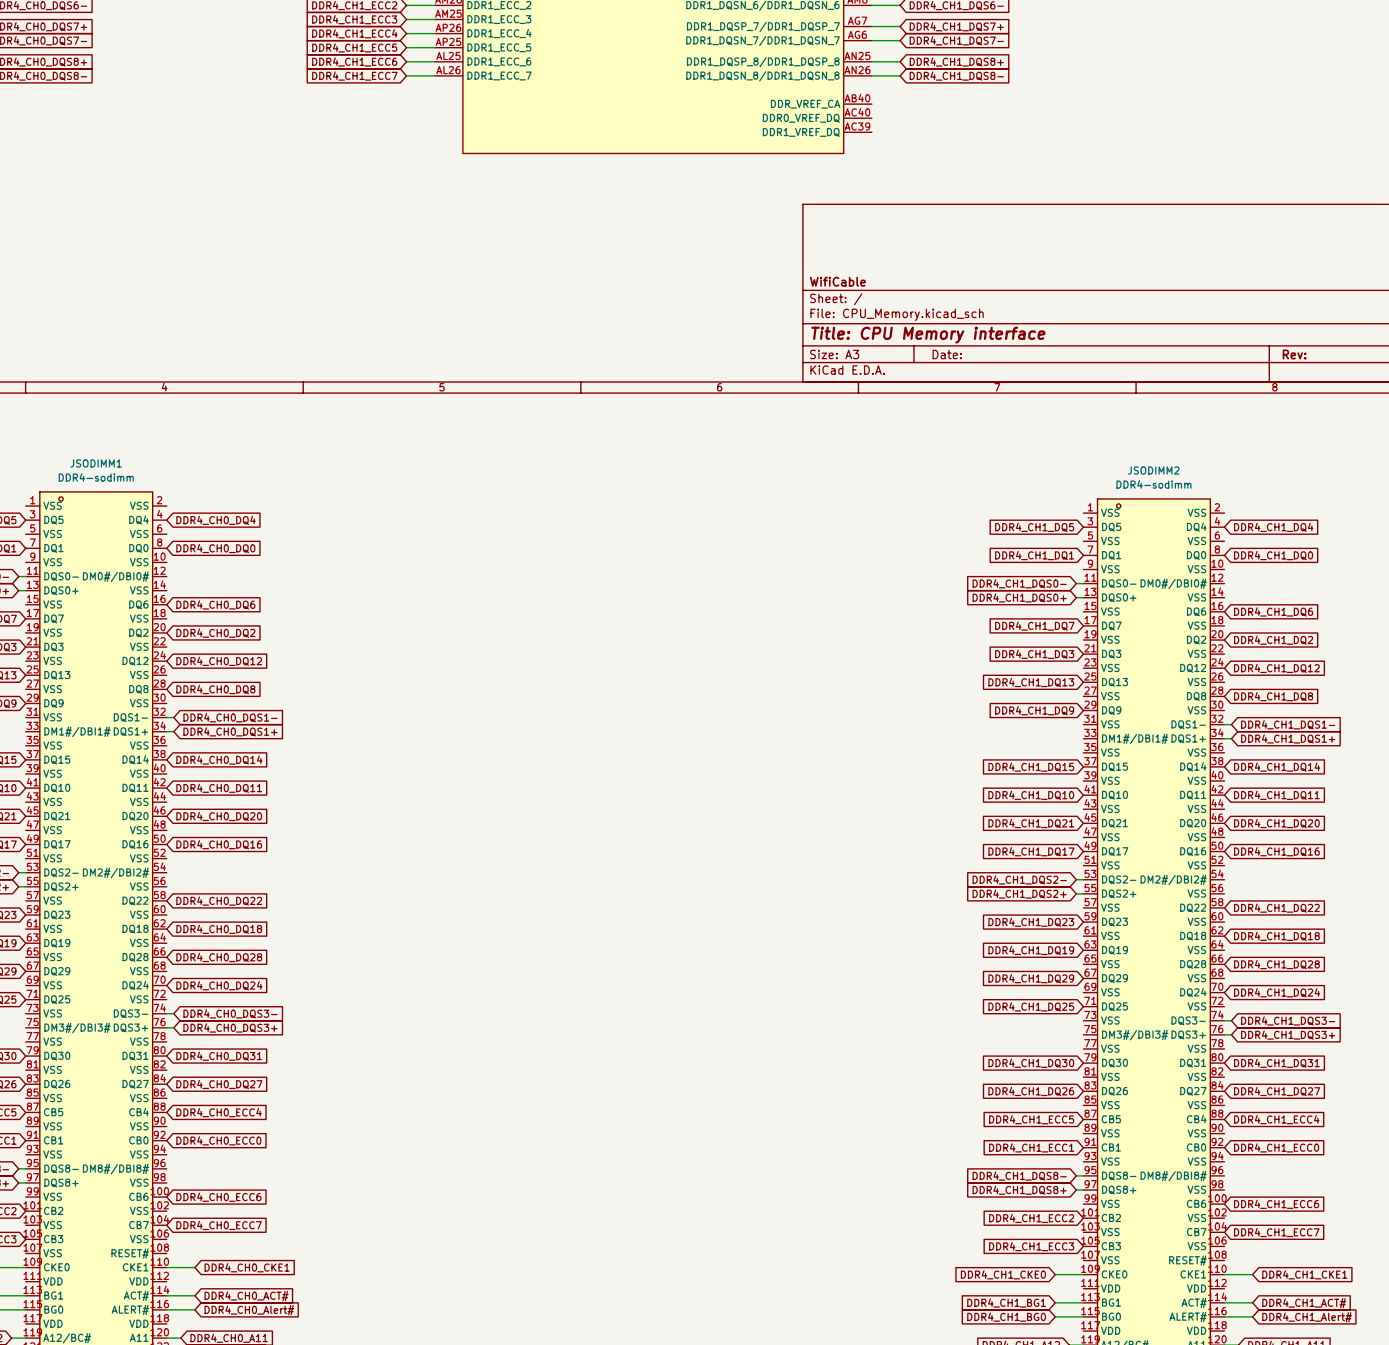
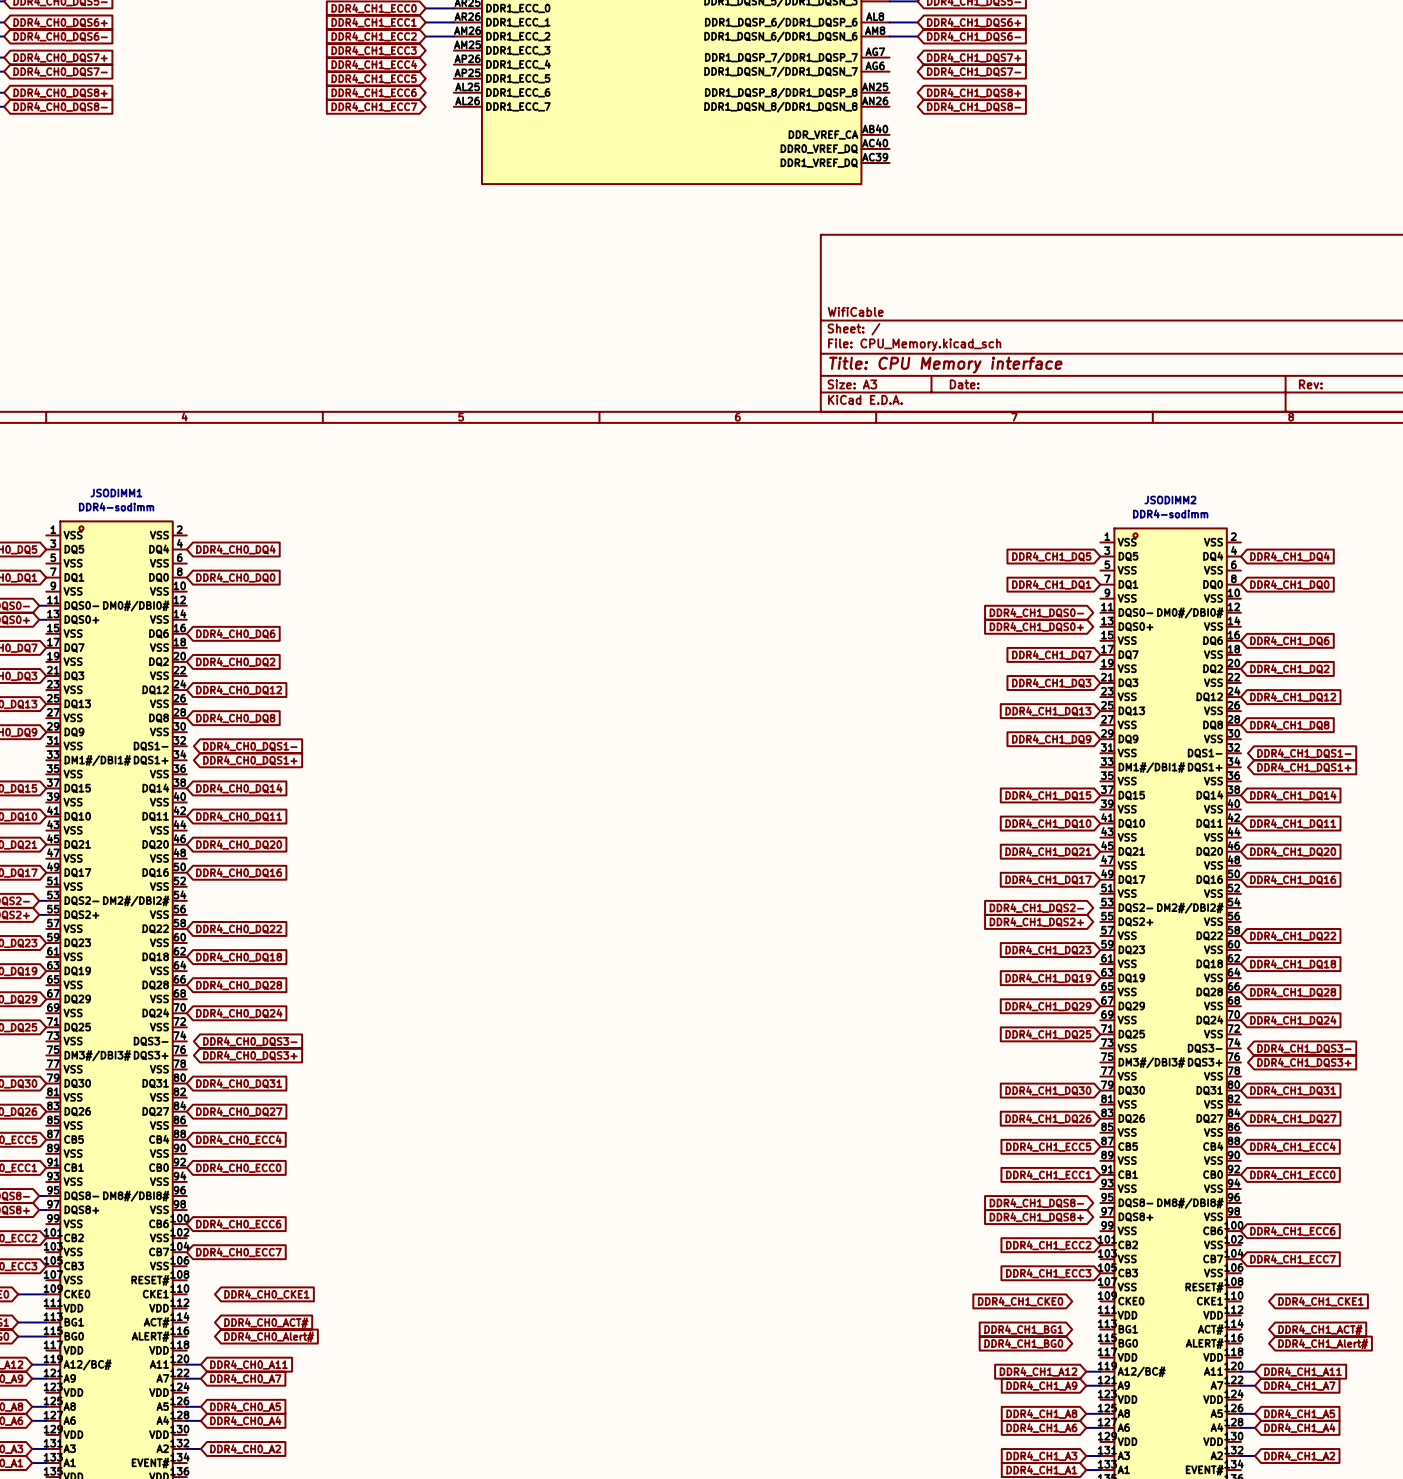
wire: (406, 19) (434, 19) -> none
wire: (871, 26) (900, 26) -> none
wire: (406, 33) (434, 33) -> none
wire: (871, 40) (900, 40) -> none
wire: (406, 47) (434, 47) -> none
wire: (406, 61) (434, 61) -> none
wire: (871, 61) (900, 61) -> none
wire: (406, 75) (434, 75) -> none
wire: (871, 75) (900, 75) -> none
wire: (1076, 583) (1083, 583) -> none
wire: (1076, 597) (1083, 597) -> none
wire: (166, 717) (173, 717) -> none
wire: (1224, 724) (1231, 724) -> none
wire: (166, 731) (173, 731) -> none
wire: (1224, 738) (1231, 738) -> none
wire: (1076, 879) (1083, 879) -> none
wire: (1076, 893) (1083, 893) -> none
wire: (166, 1013) (173, 1013) -> none
wire: (1224, 1020) (1231, 1020) -> none
wire: (166, 1027) (173, 1027) -> none
wire: (1224, 1034) (1231, 1034) -> none
wire: (1076, 1175) (1083, 1175) -> none
wire: (1076, 1190) (1083, 1190) -> none
wire: (166, 1267) (194, 1267) -> none
wire: (1055, 1274) (1083, 1274) -> none
wire: (1224, 1274) (1252, 1274) -> none
wire: (166, 1295) (194, 1295) -> none
wire: (1055, 1302) (1083, 1302) -> none
wire: (1224, 1302) (1252, 1302) -> none
wire: (166, 1309) (194, 1309) -> none
wire: (1055, 1316) (1083, 1316) -> none
wire: (1224, 1316) (1252, 1316) -> none

